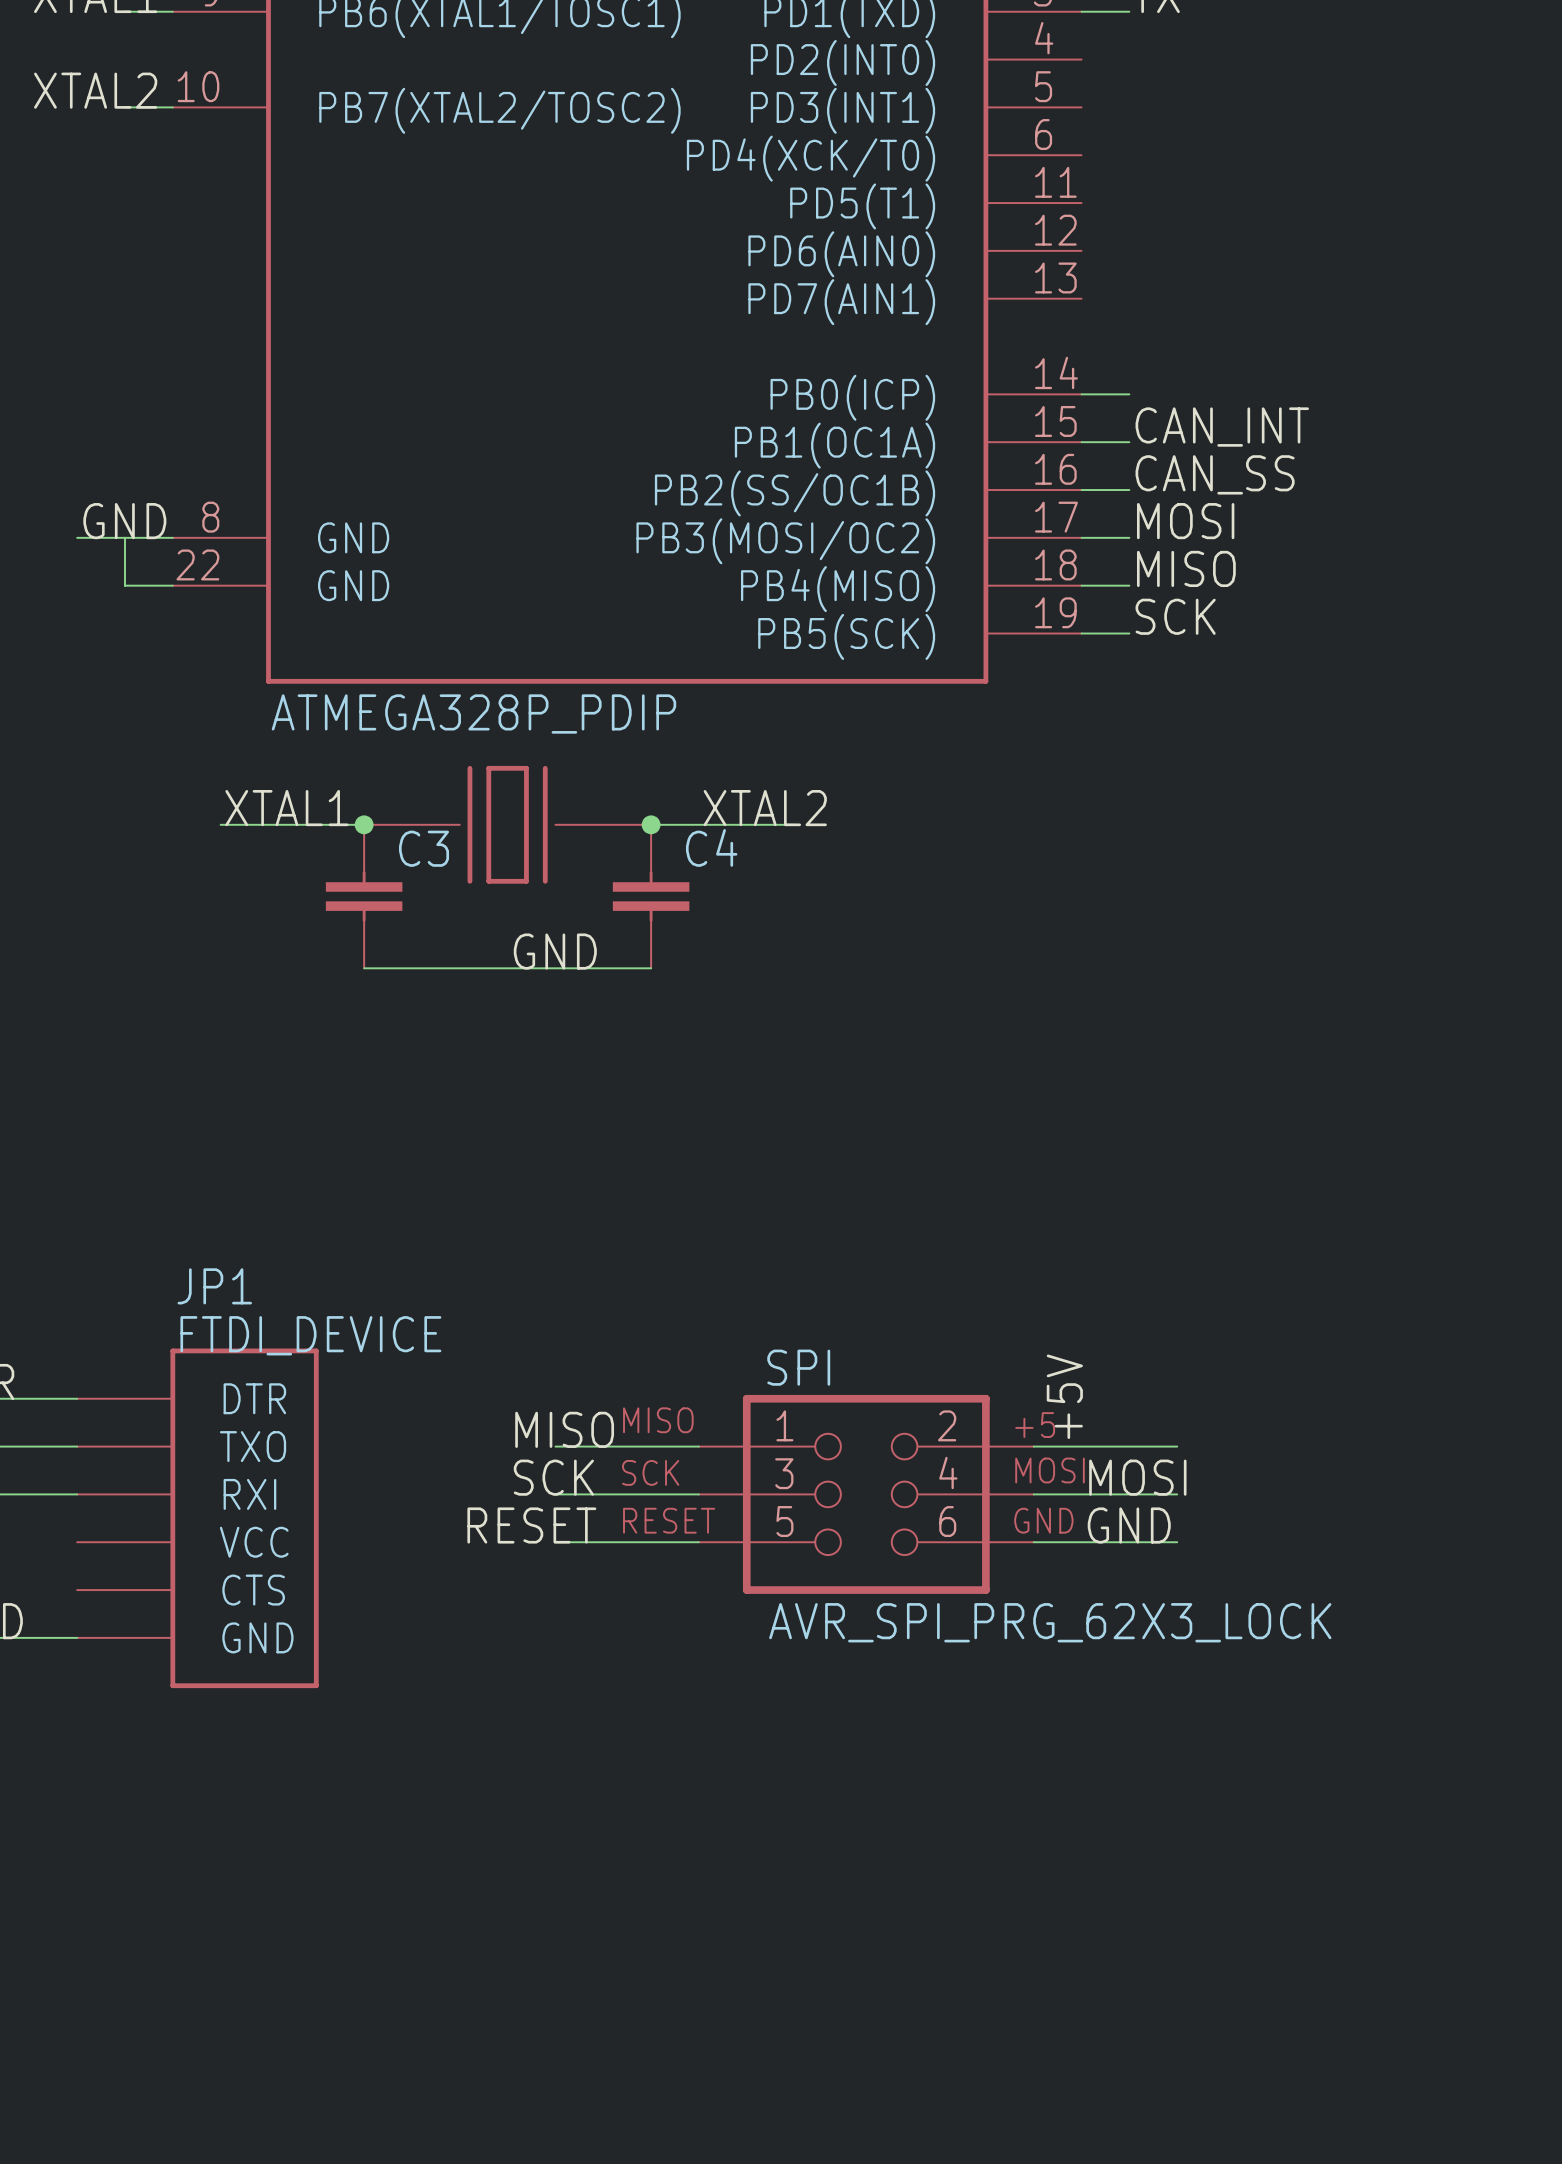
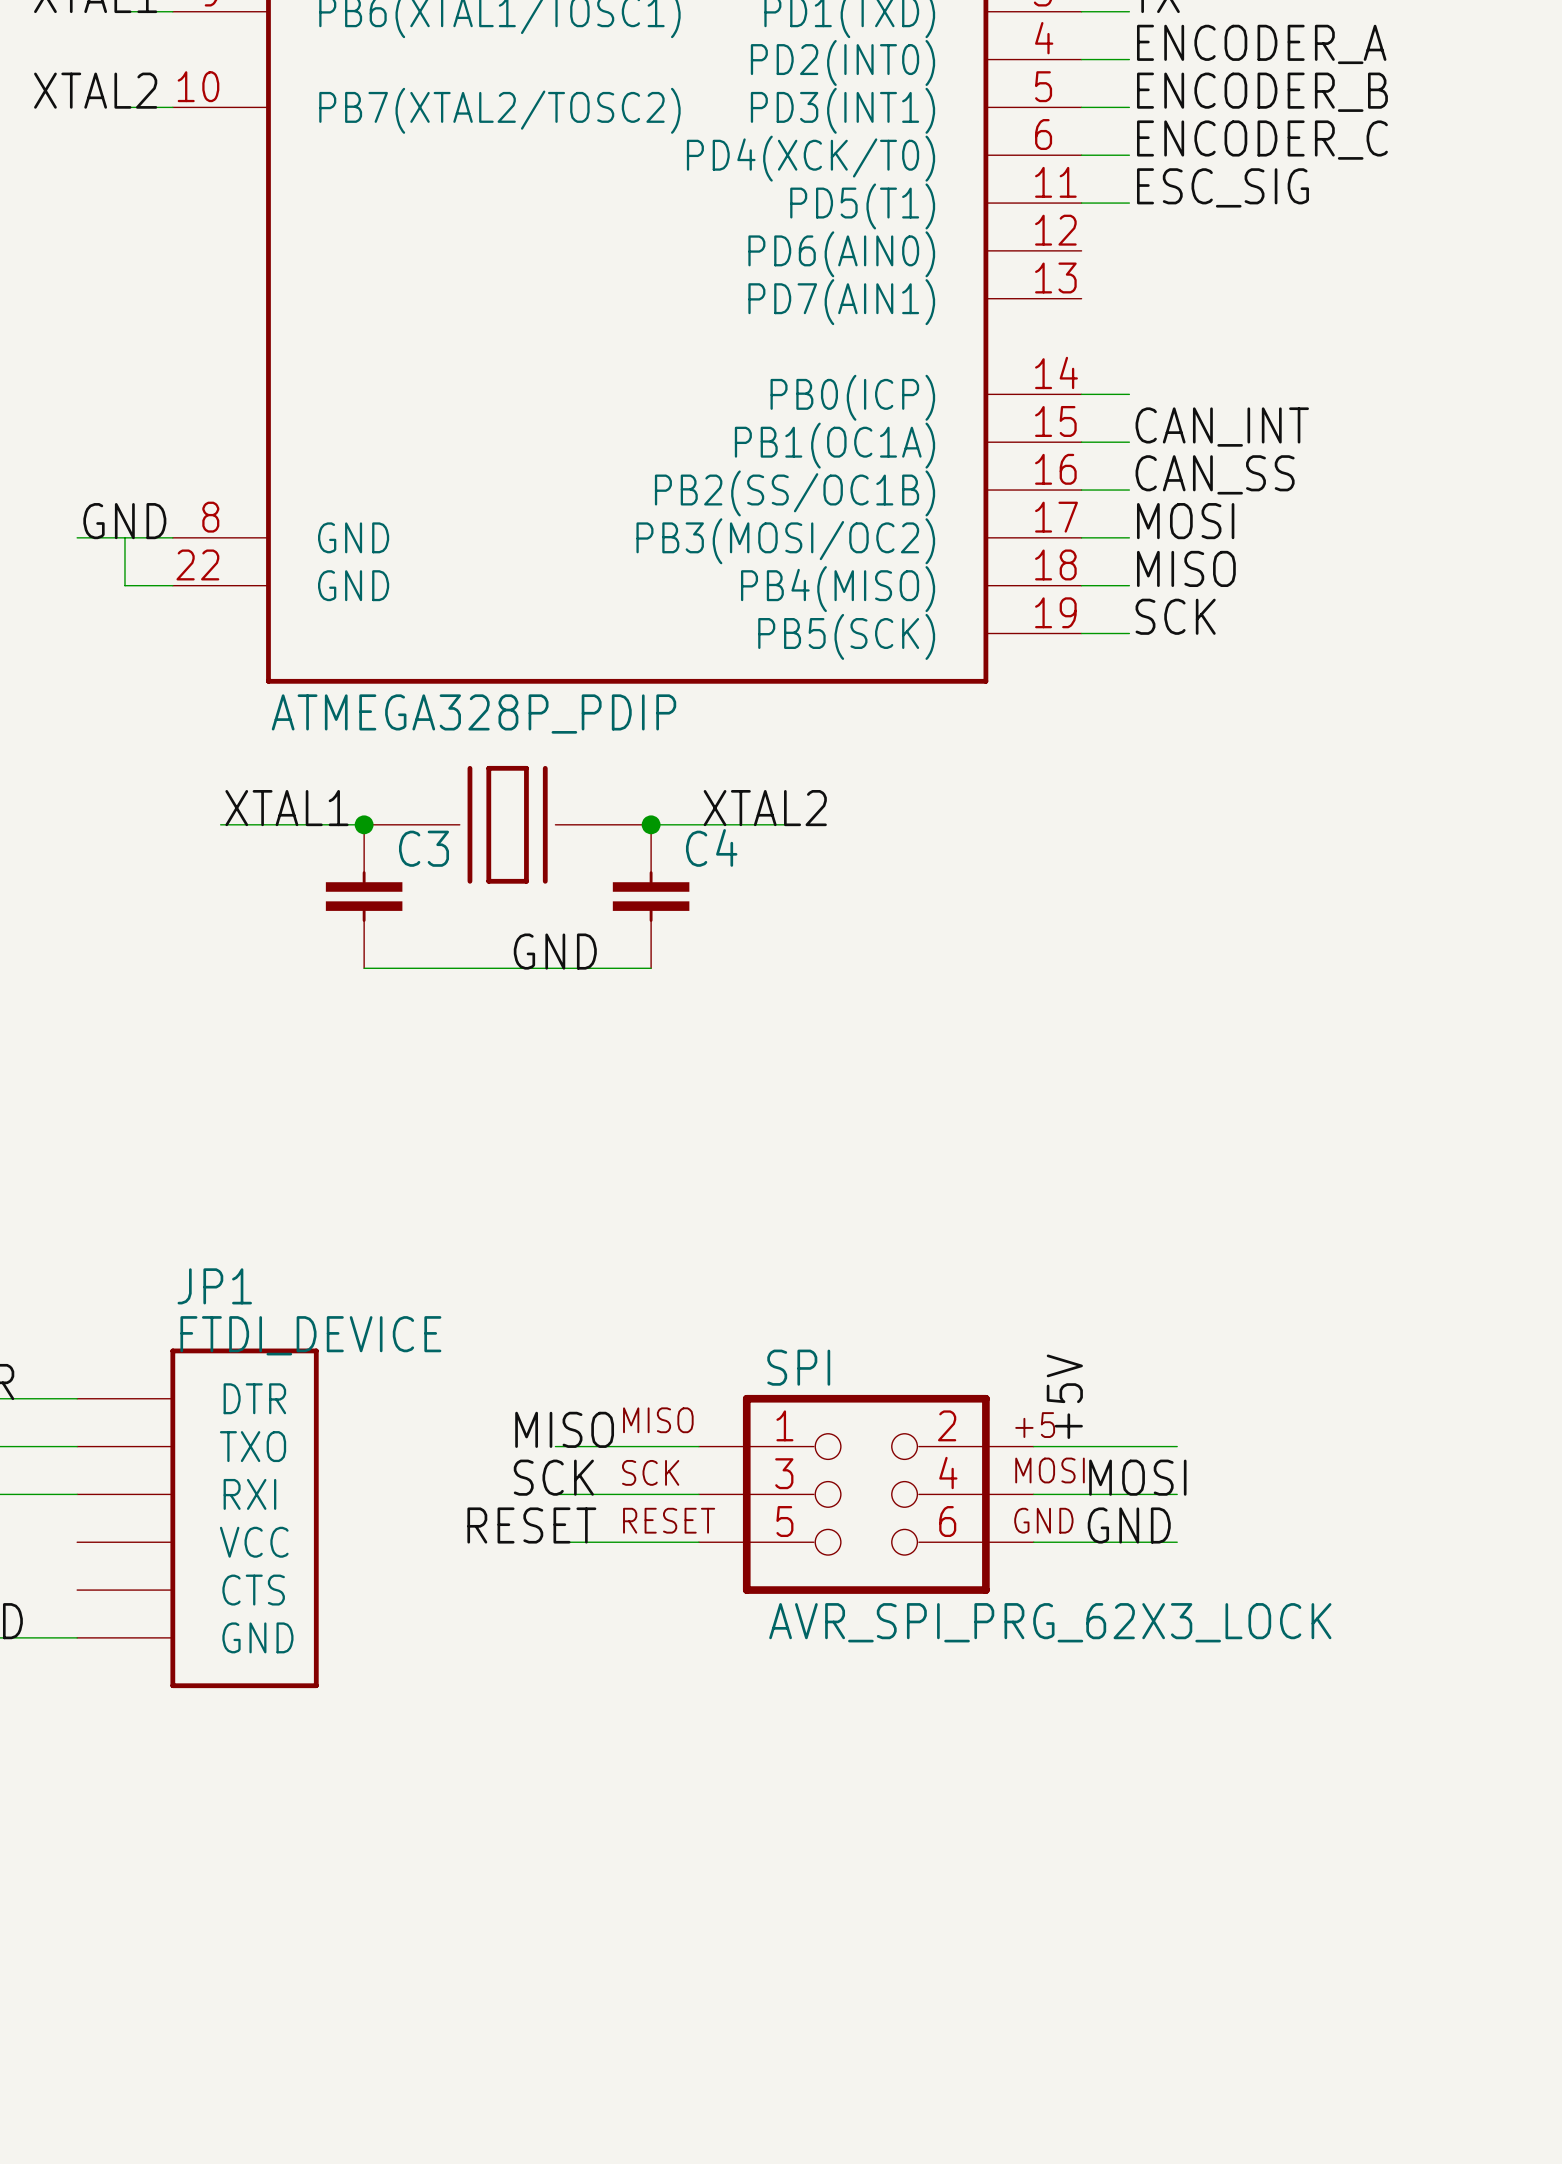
label: none -> ENCODER_A (1261, 44)
wire: none -> (1081, 59) (1129, 59)
label: none -> ENCODER_B (1262, 92)
wire: none -> (1081, 107) (1129, 107)
label: none -> ENCODER_C (1262, 140)
wire: none -> (1081, 155) (1129, 155)
label: none -> ESC_SIG (1222, 187)
wire: none -> (1081, 203) (1129, 203)

